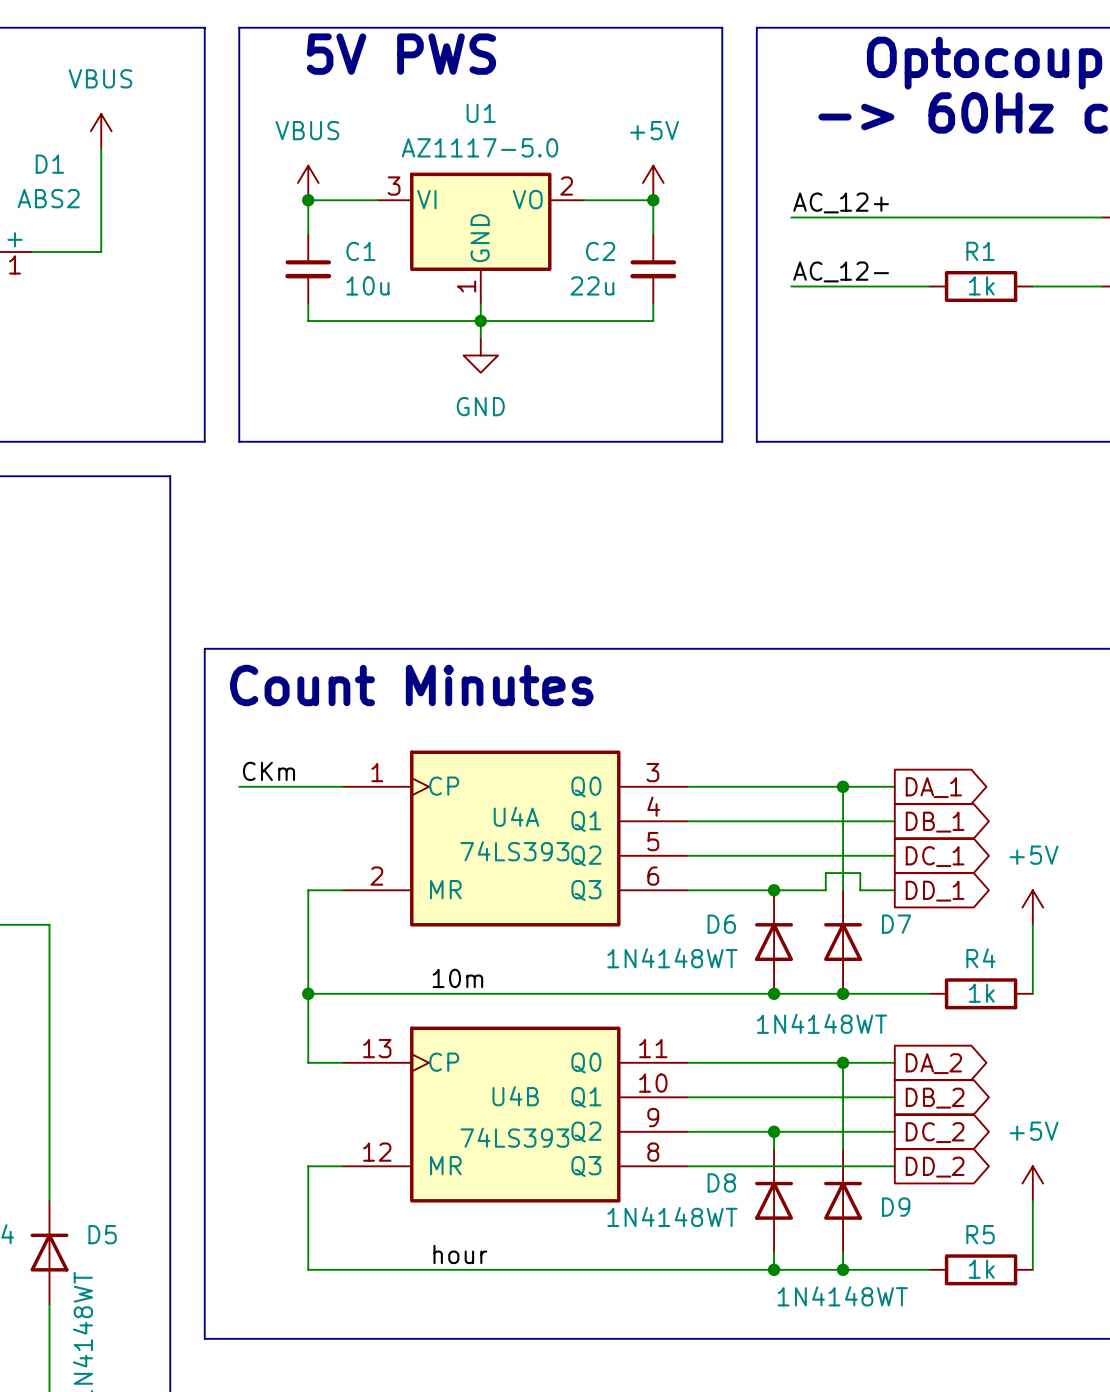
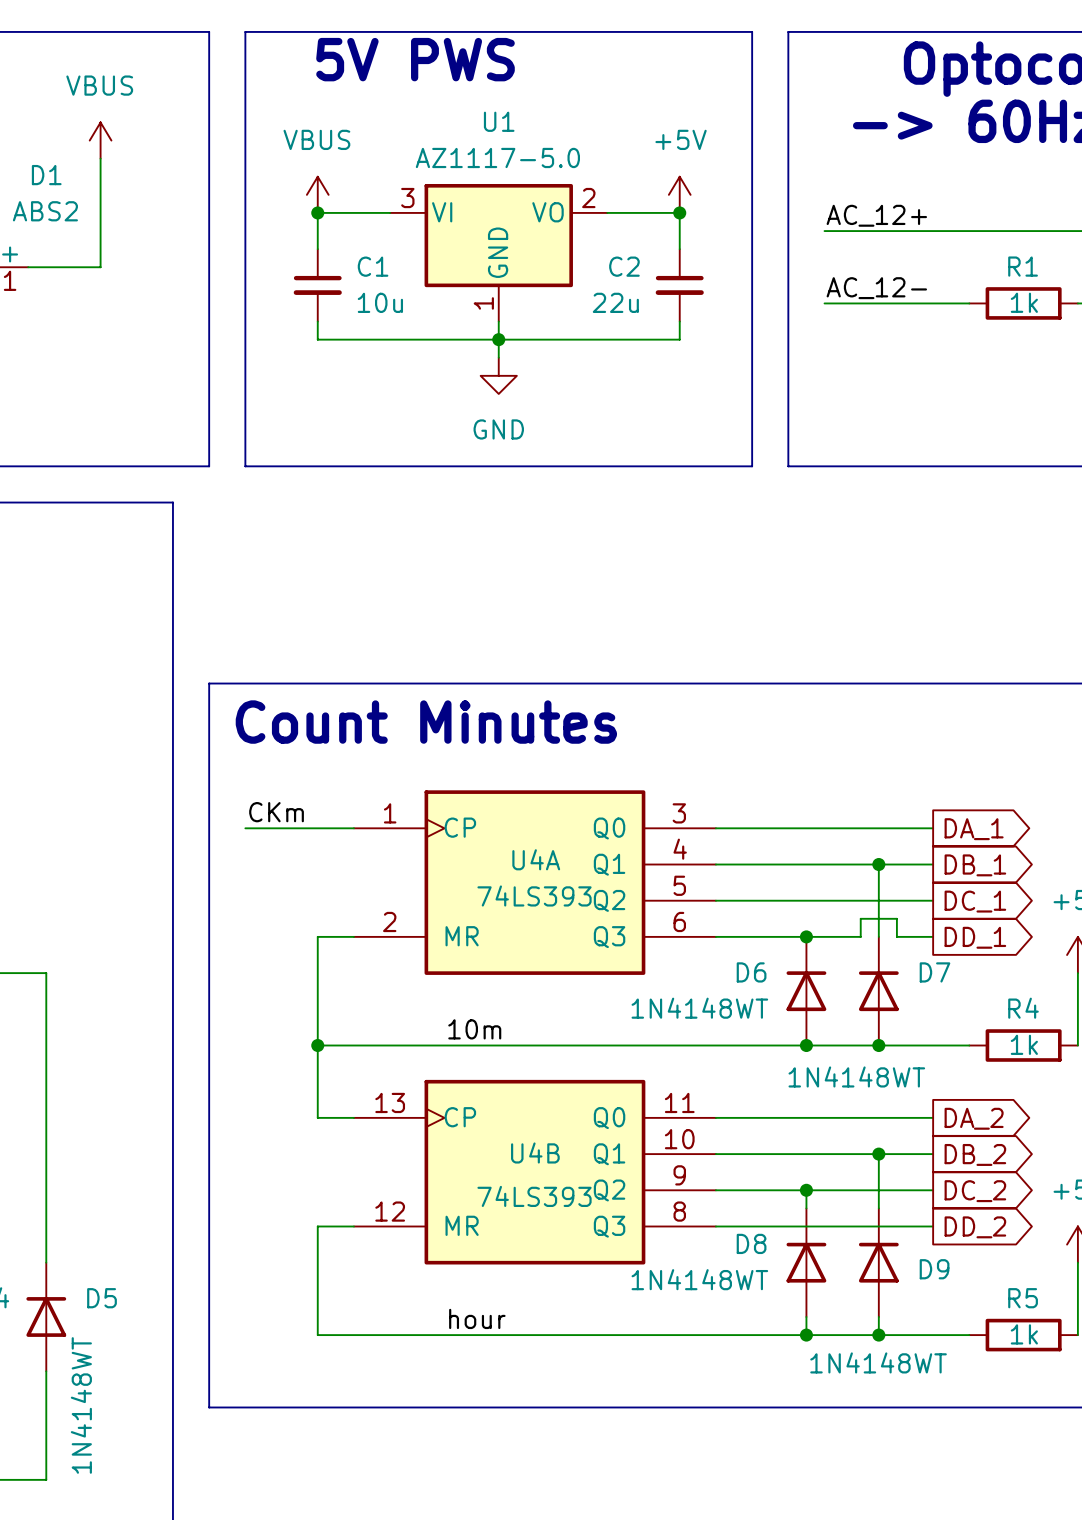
wire: (843, 786) (843, 821) -> none
junction position: (843, 786) -> (878, 864)
wire: (843, 1062) (843, 1097) -> none
junction position: (843, 1062) -> (878, 1154)

